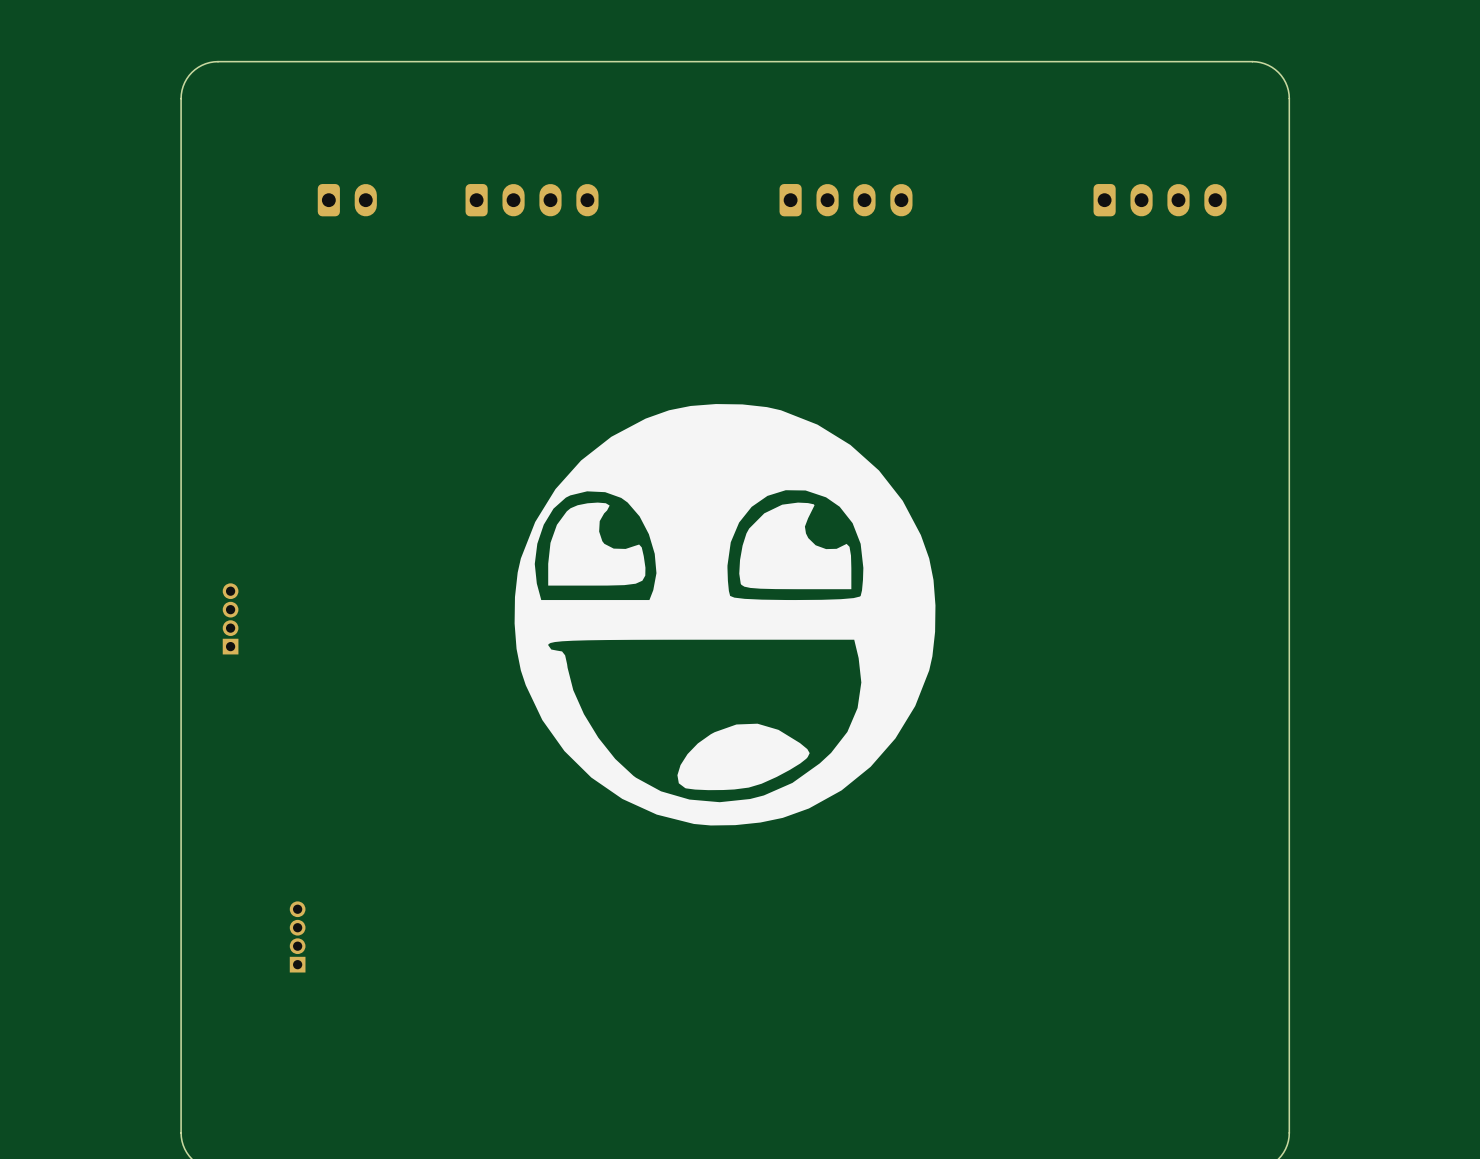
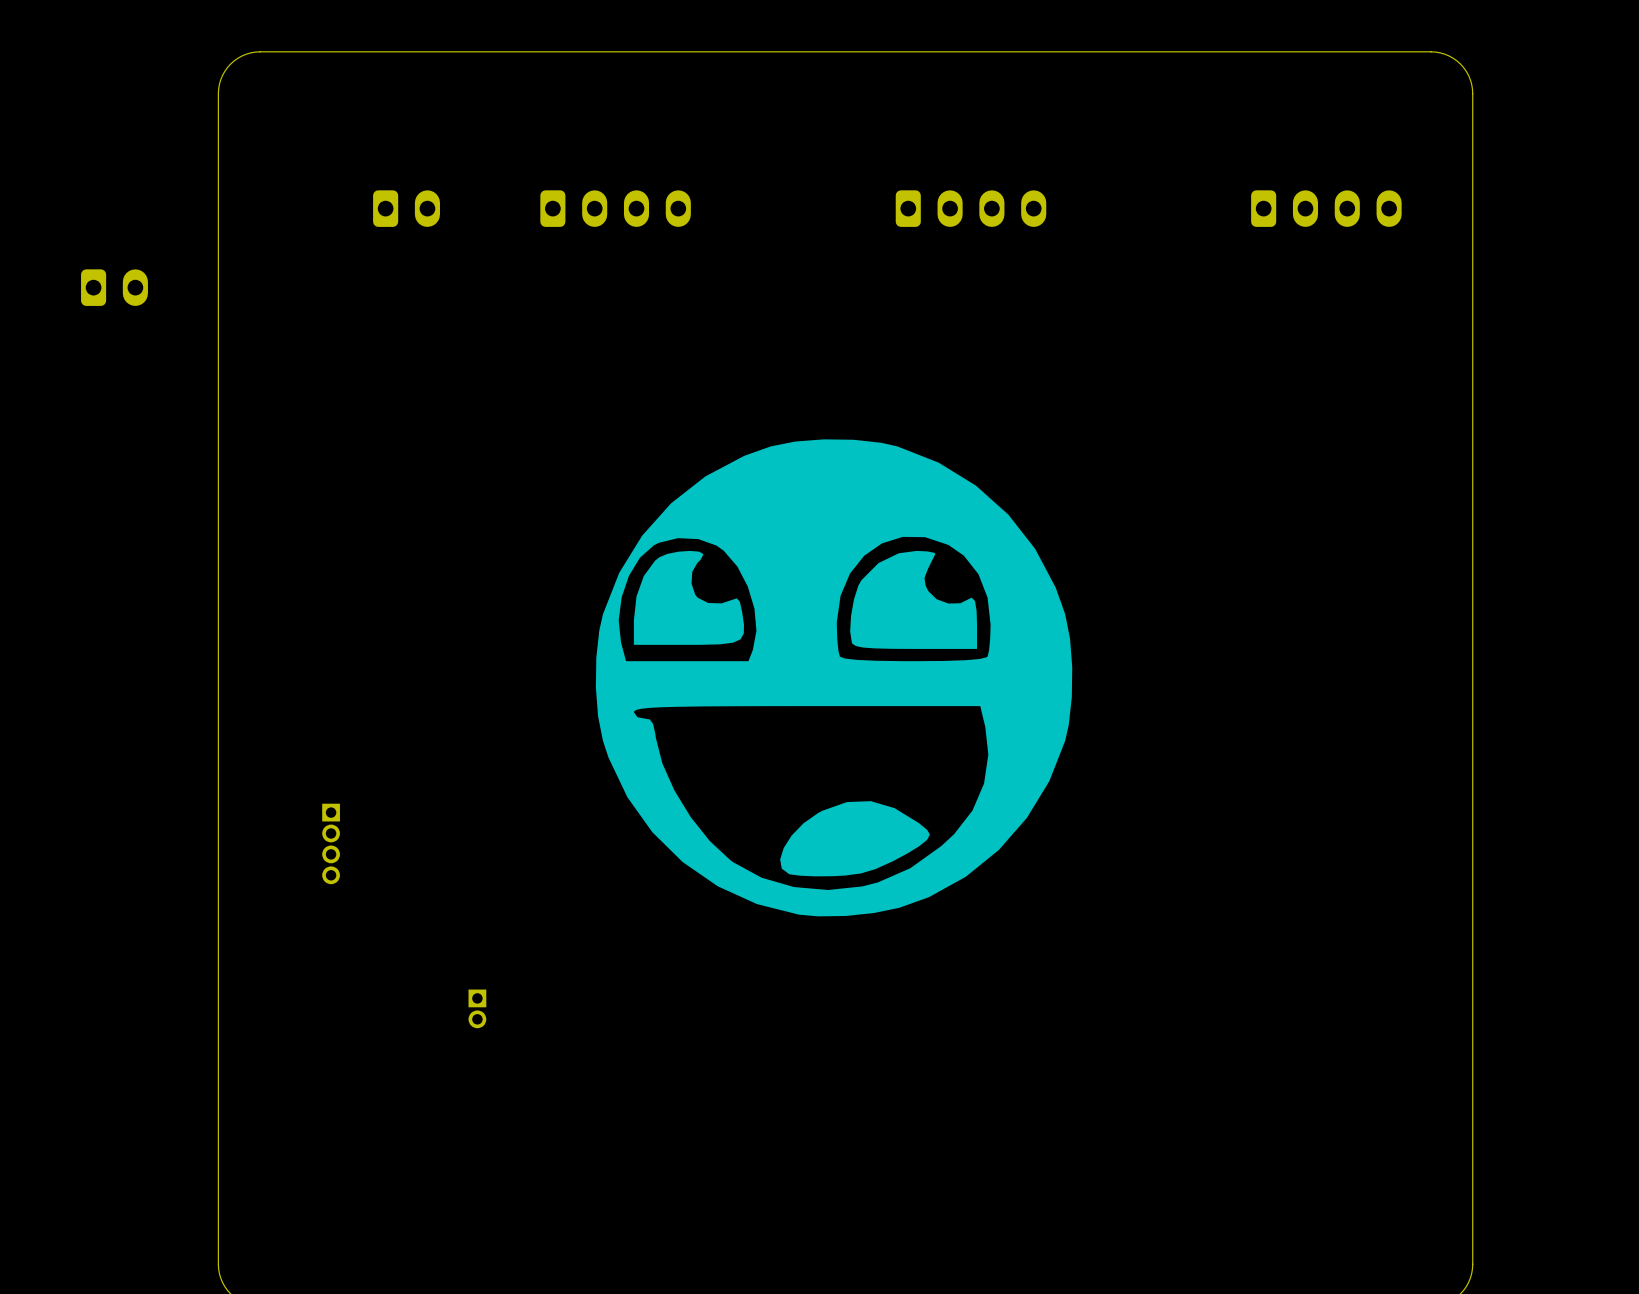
part: none -> (114, 287)
part: (230, 618) -> none
part: none -> (331, 843)
part: none -> (477, 1008)
part: (297, 936) -> none

